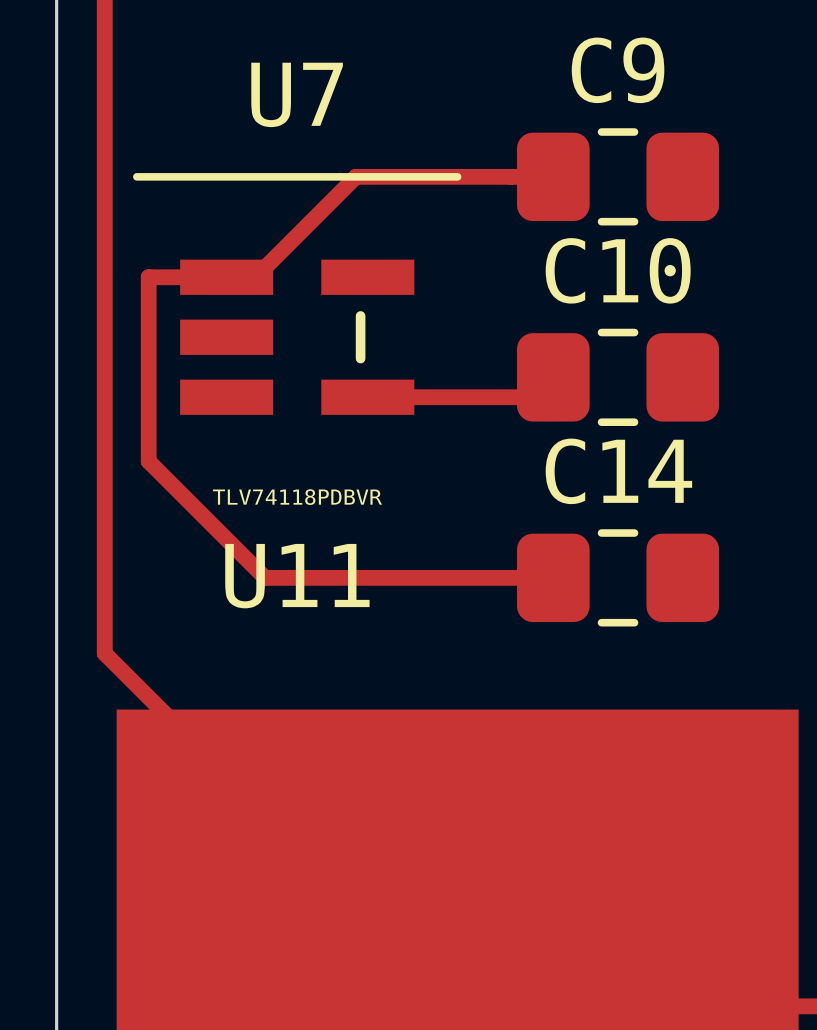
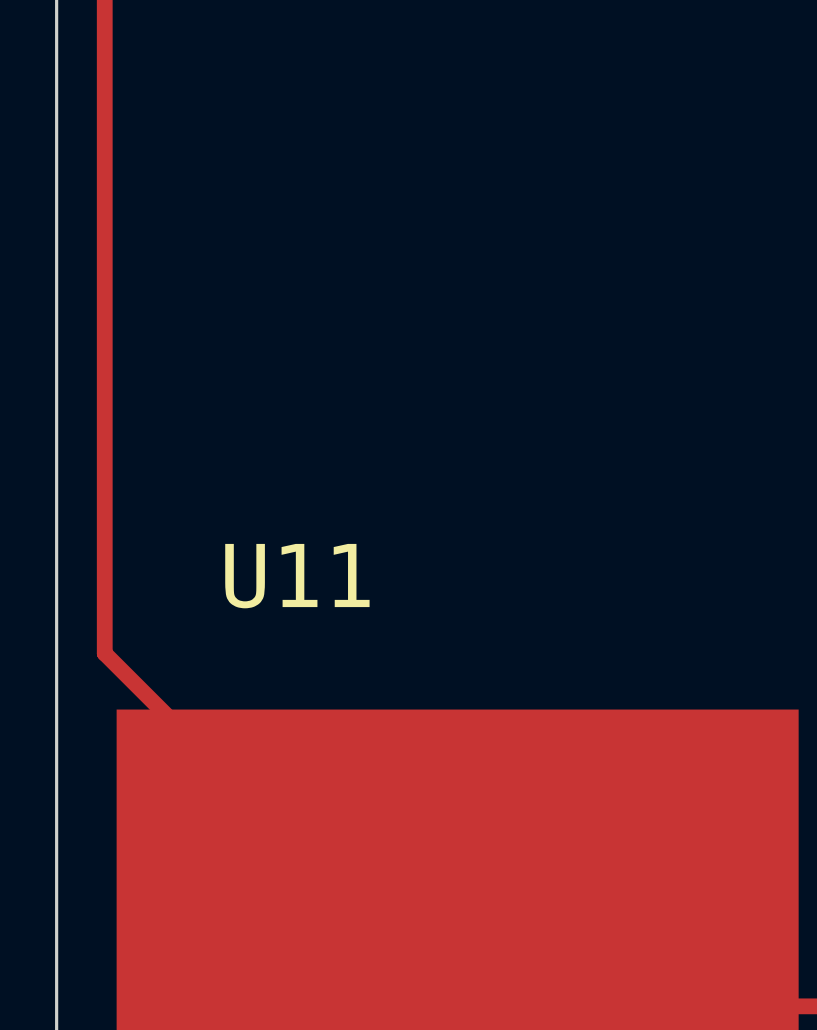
track: (553, 176) (355, 176) (255, 277) (148, 277) (148, 461) (265, 577) (553, 577) -> none
C9: (618, 176) -> none
U7: TLV74118PDBVR (297, 293) -> none
track: (553, 377) (533, 397) (367, 397) -> none
C10: (618, 377) -> none
C14: (618, 577) -> none

